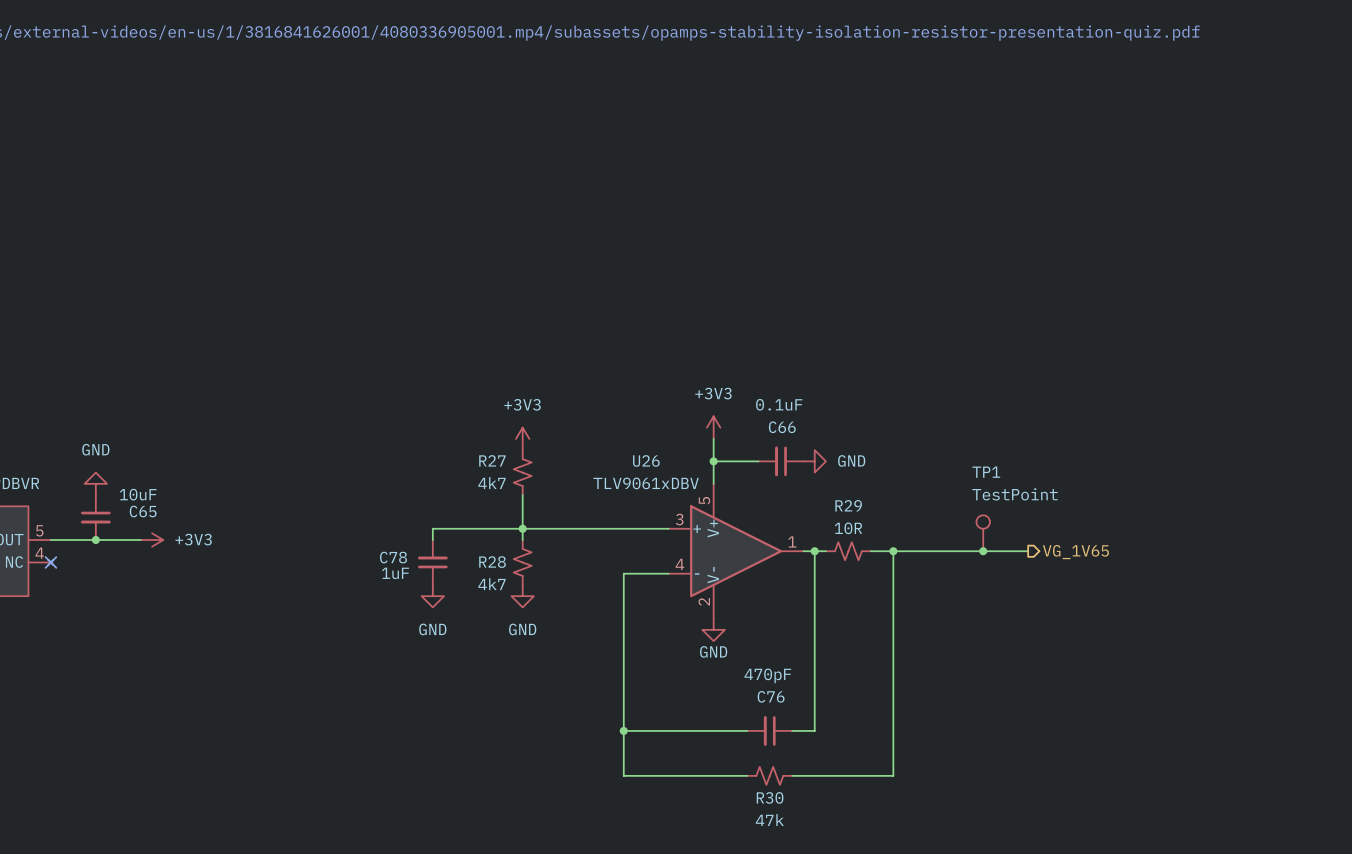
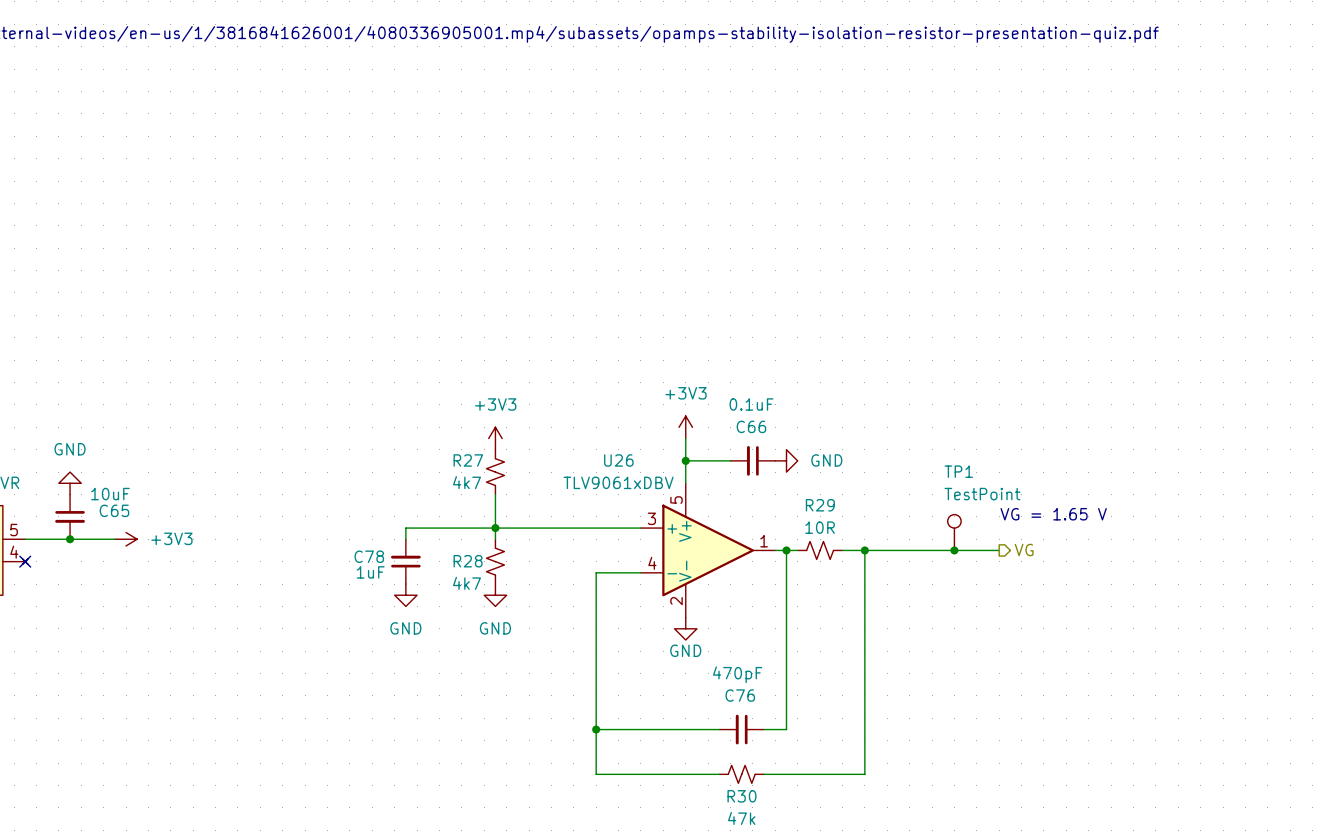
text: none -> VG = 1.65 V (1053, 514)
hierarchical label: VG_1V65 (1075, 552) -> VG (1024, 550)

